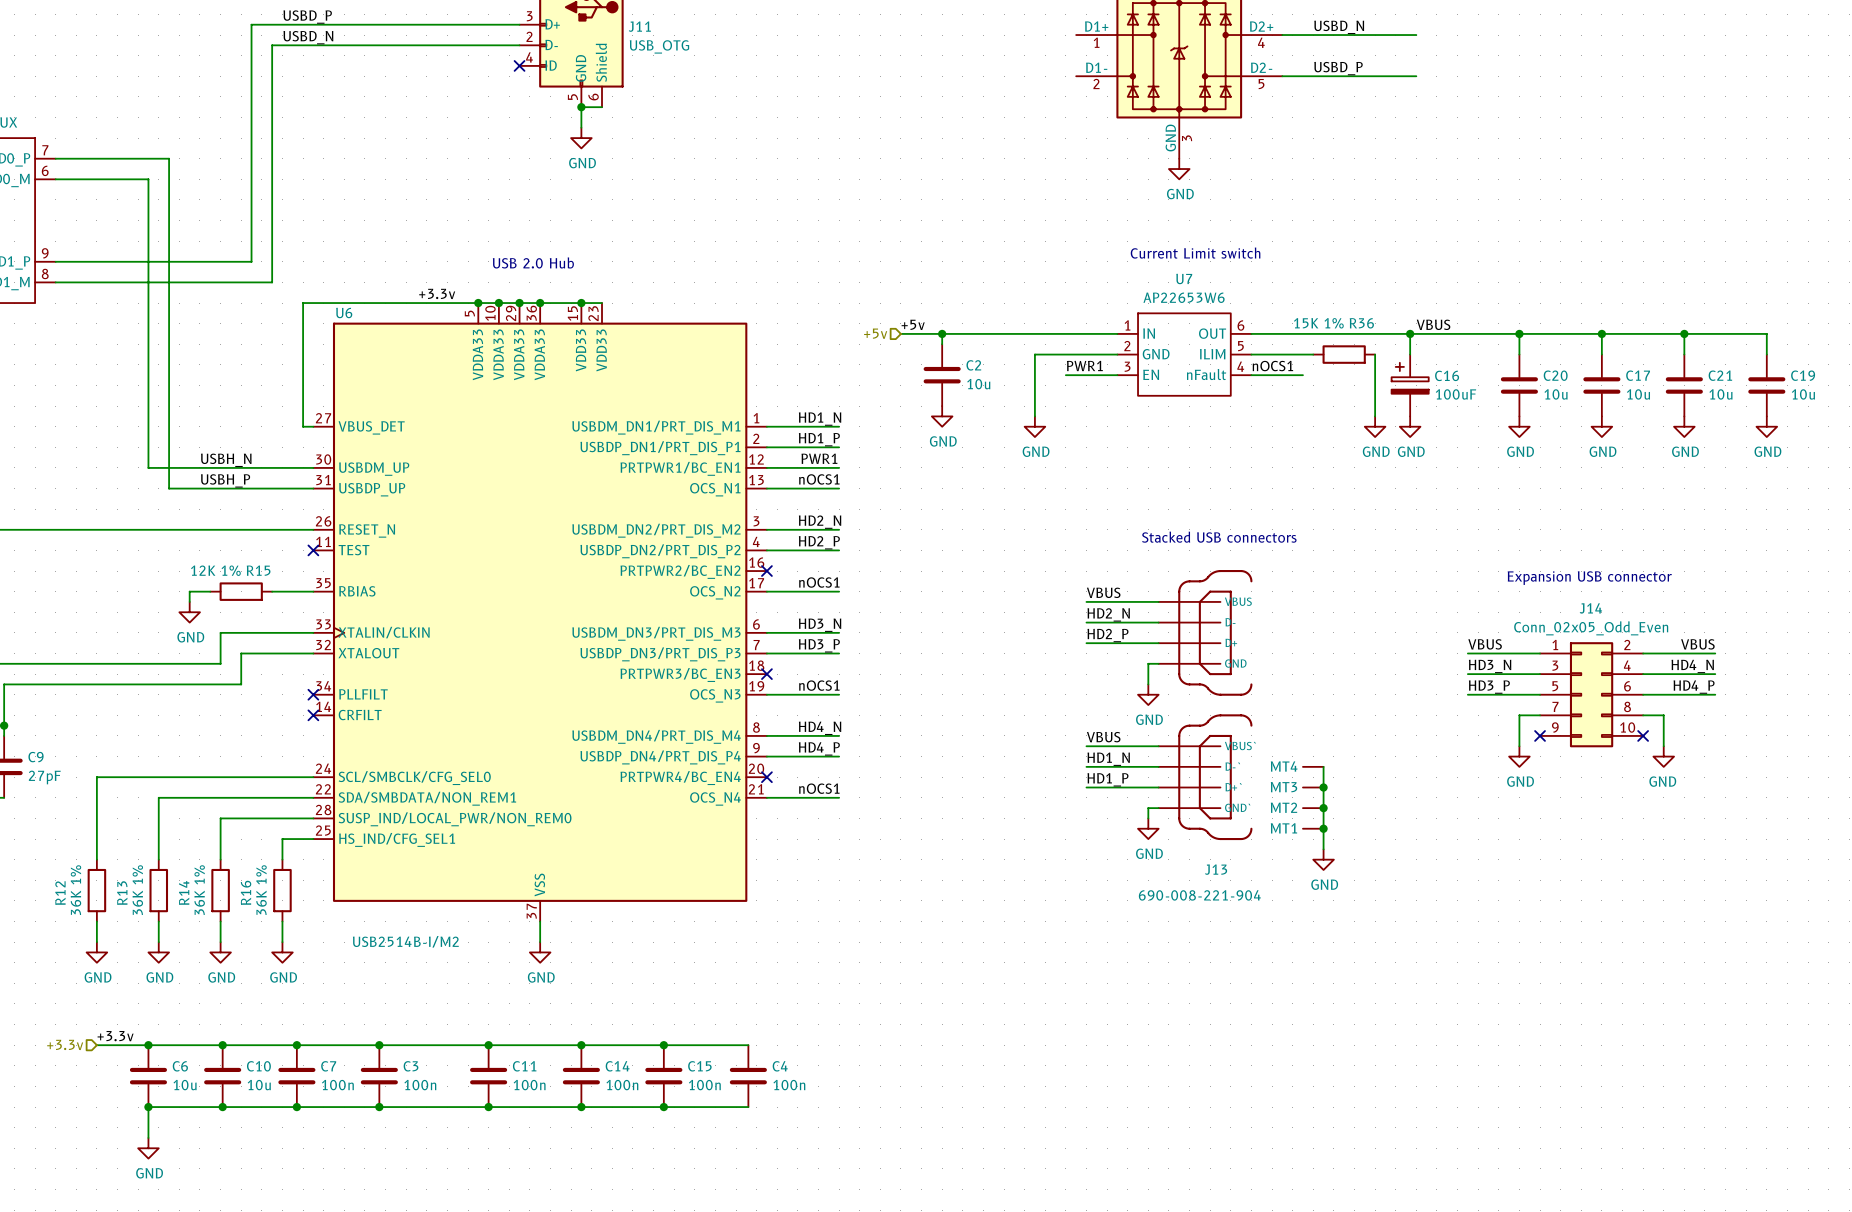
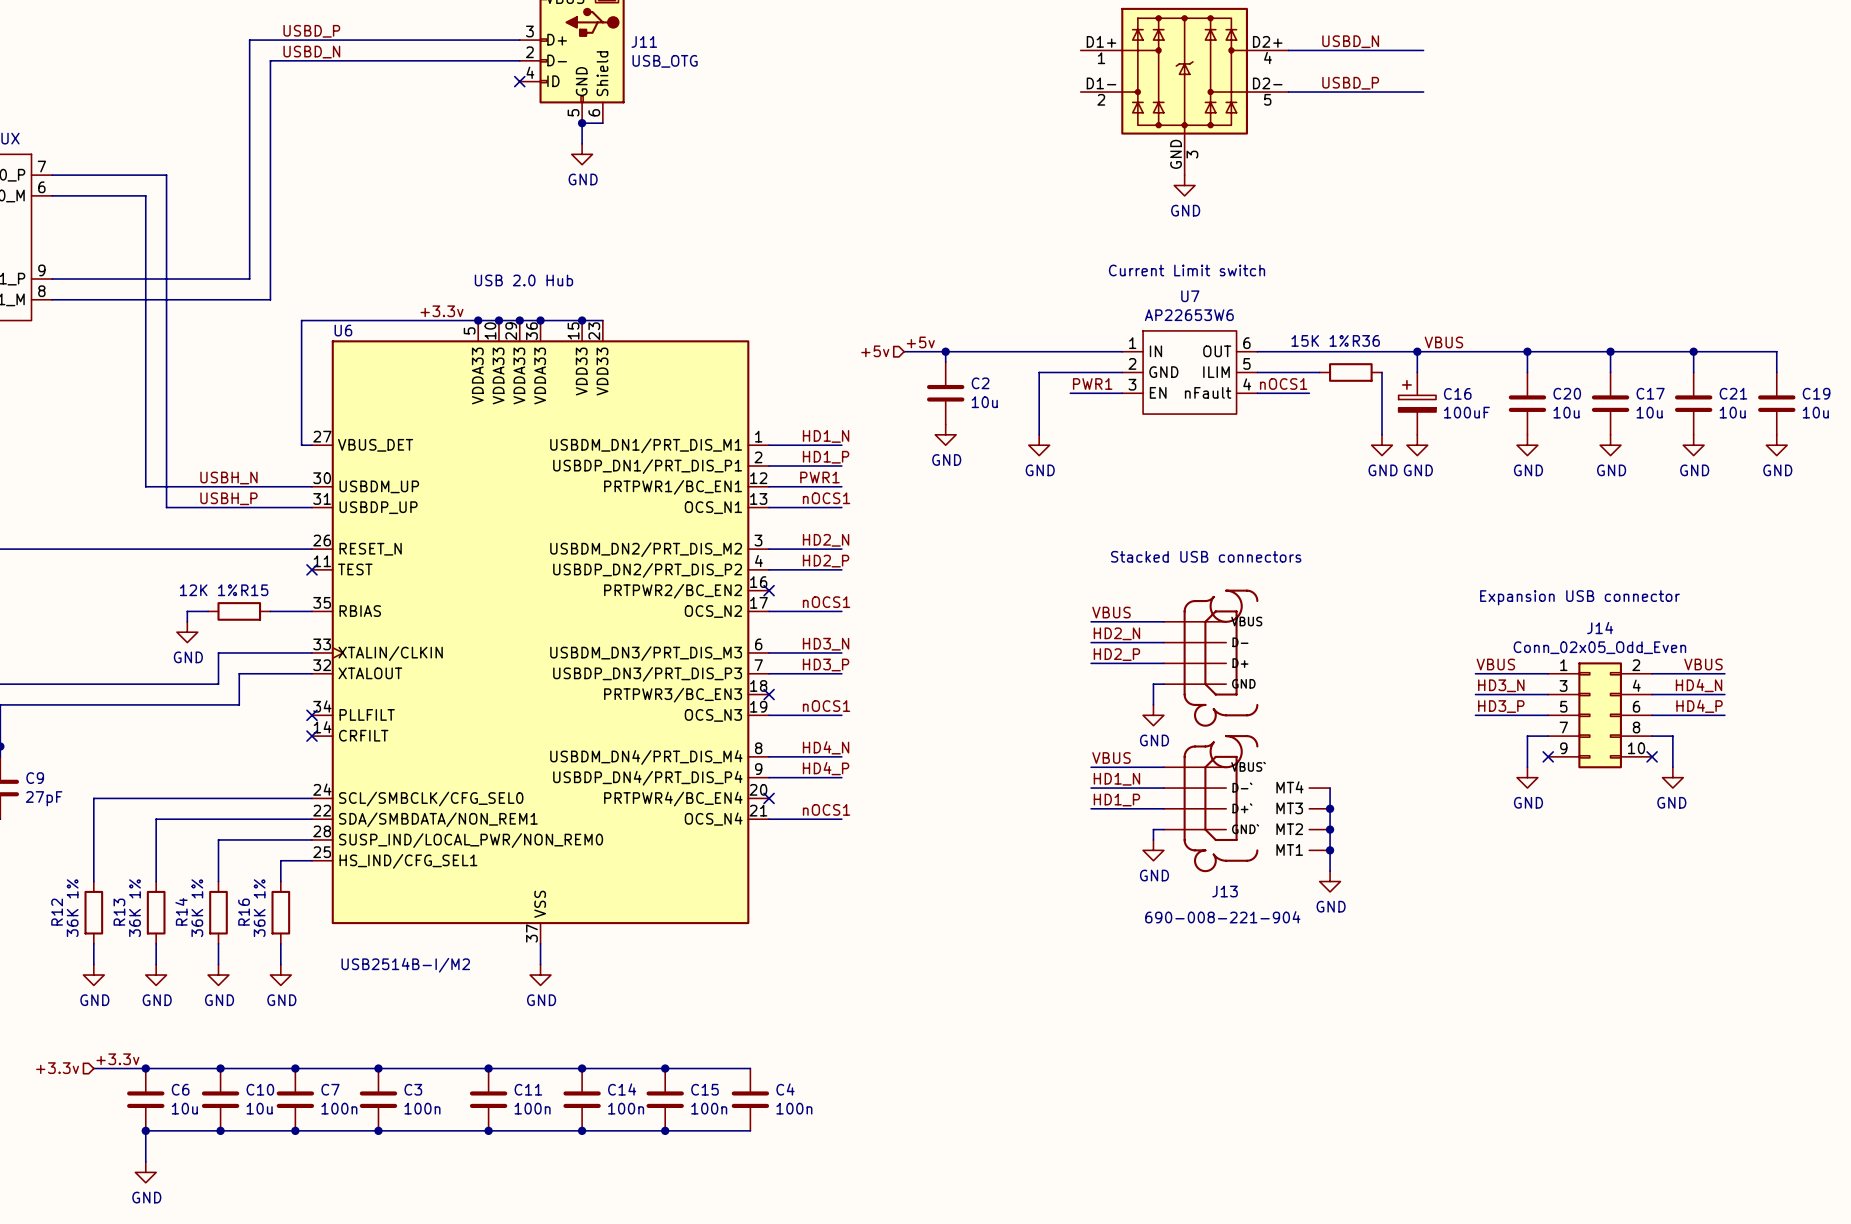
J13 symbol: [1158, 570, 1324, 841] -> [1163, 589, 1331, 873]

